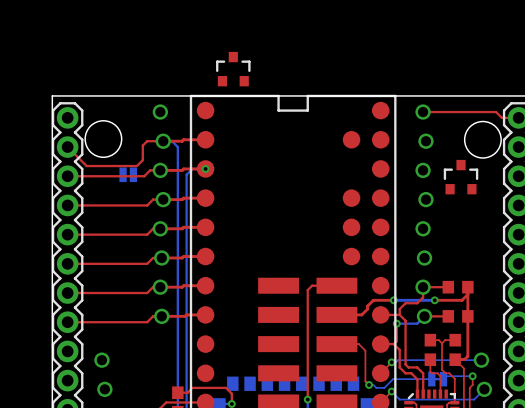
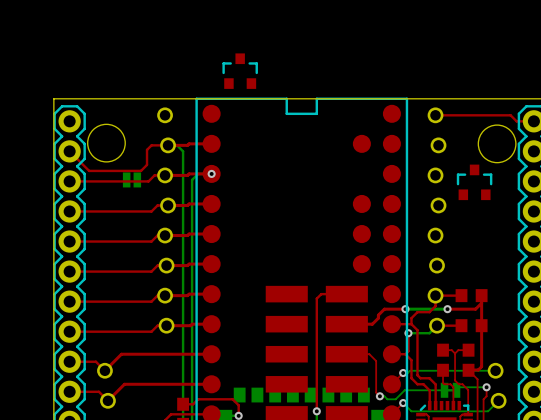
top track: none -> (211, 354) (121, 354) (104, 370) (95, 361) (69, 361)
top track: none -> (211, 384) (124, 384) (107, 400) (98, 391) (69, 391)

